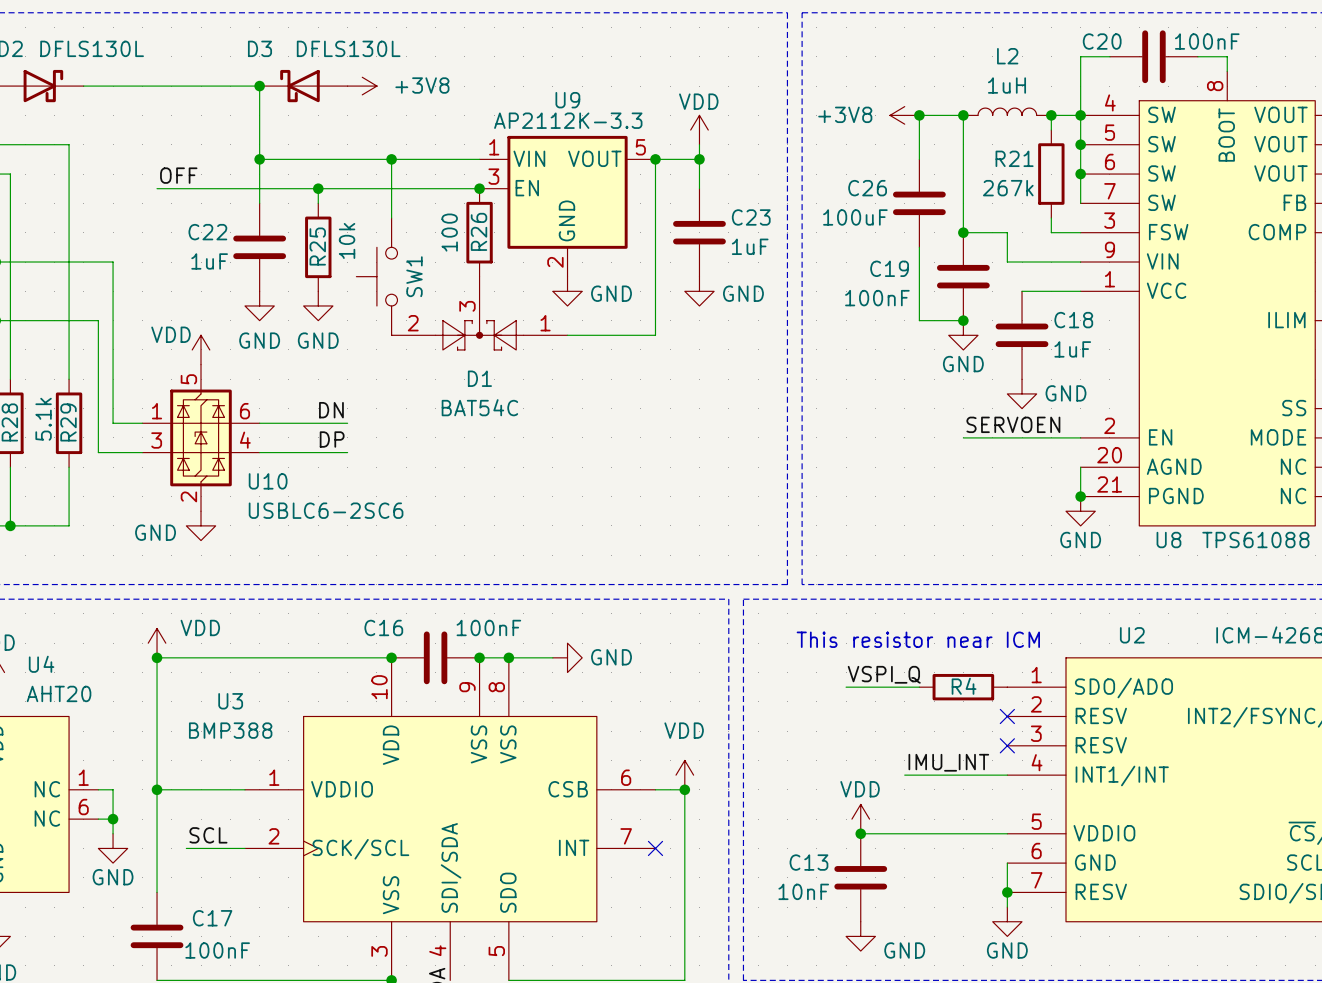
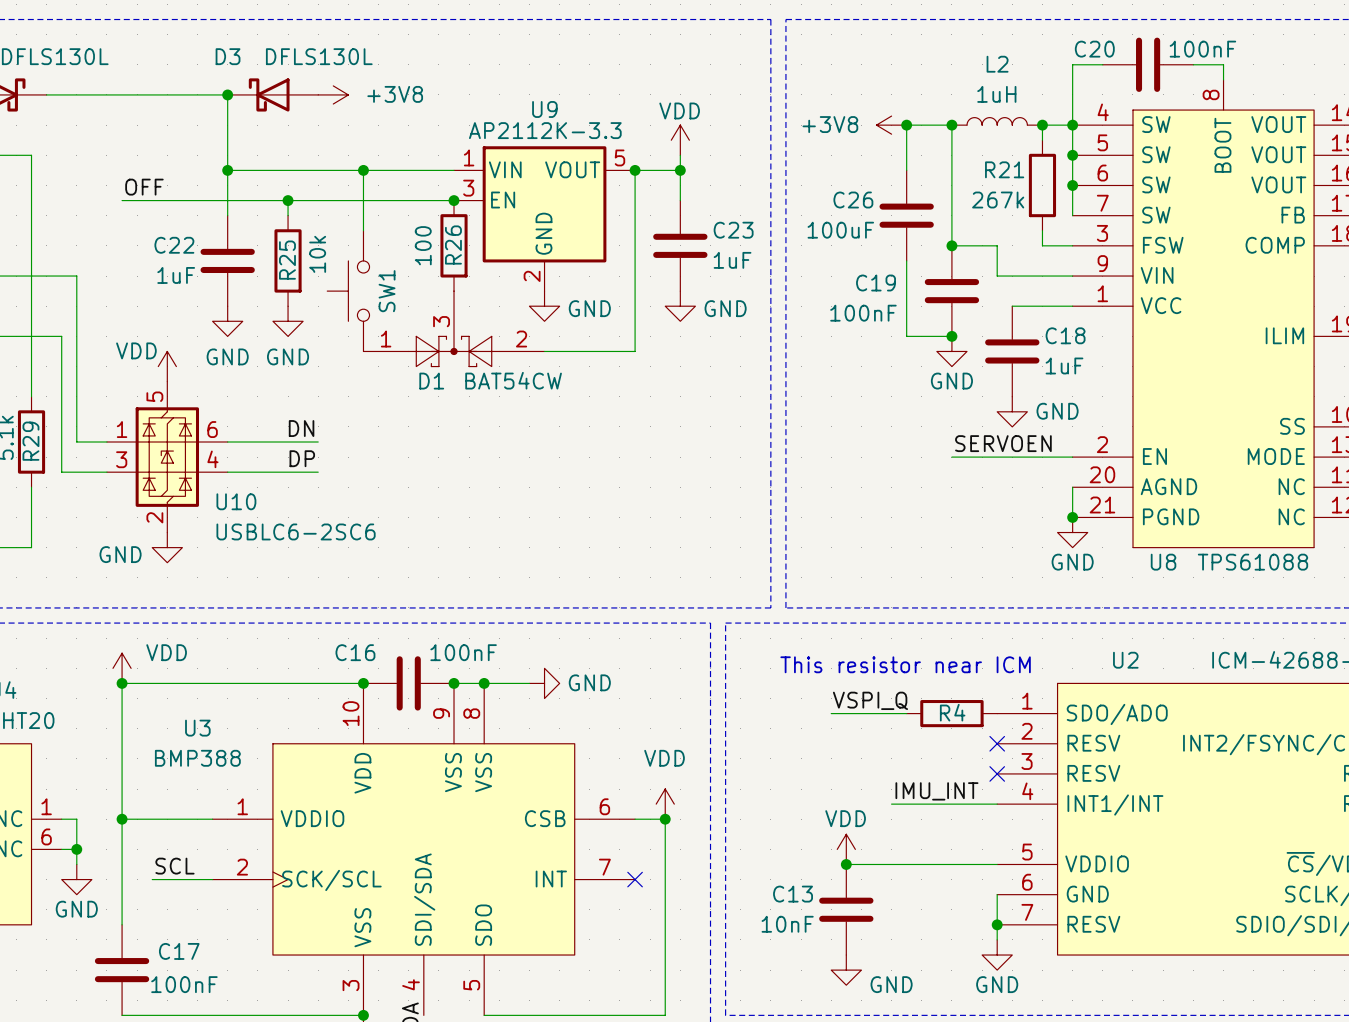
D1 flip: as is (479, 335) -> left-right (454, 351)
D1 name position: D1 (479, 378) -> D1 (431, 381)
D1 value: BAT54C (479, 407) -> BAT54CW (513, 380)

